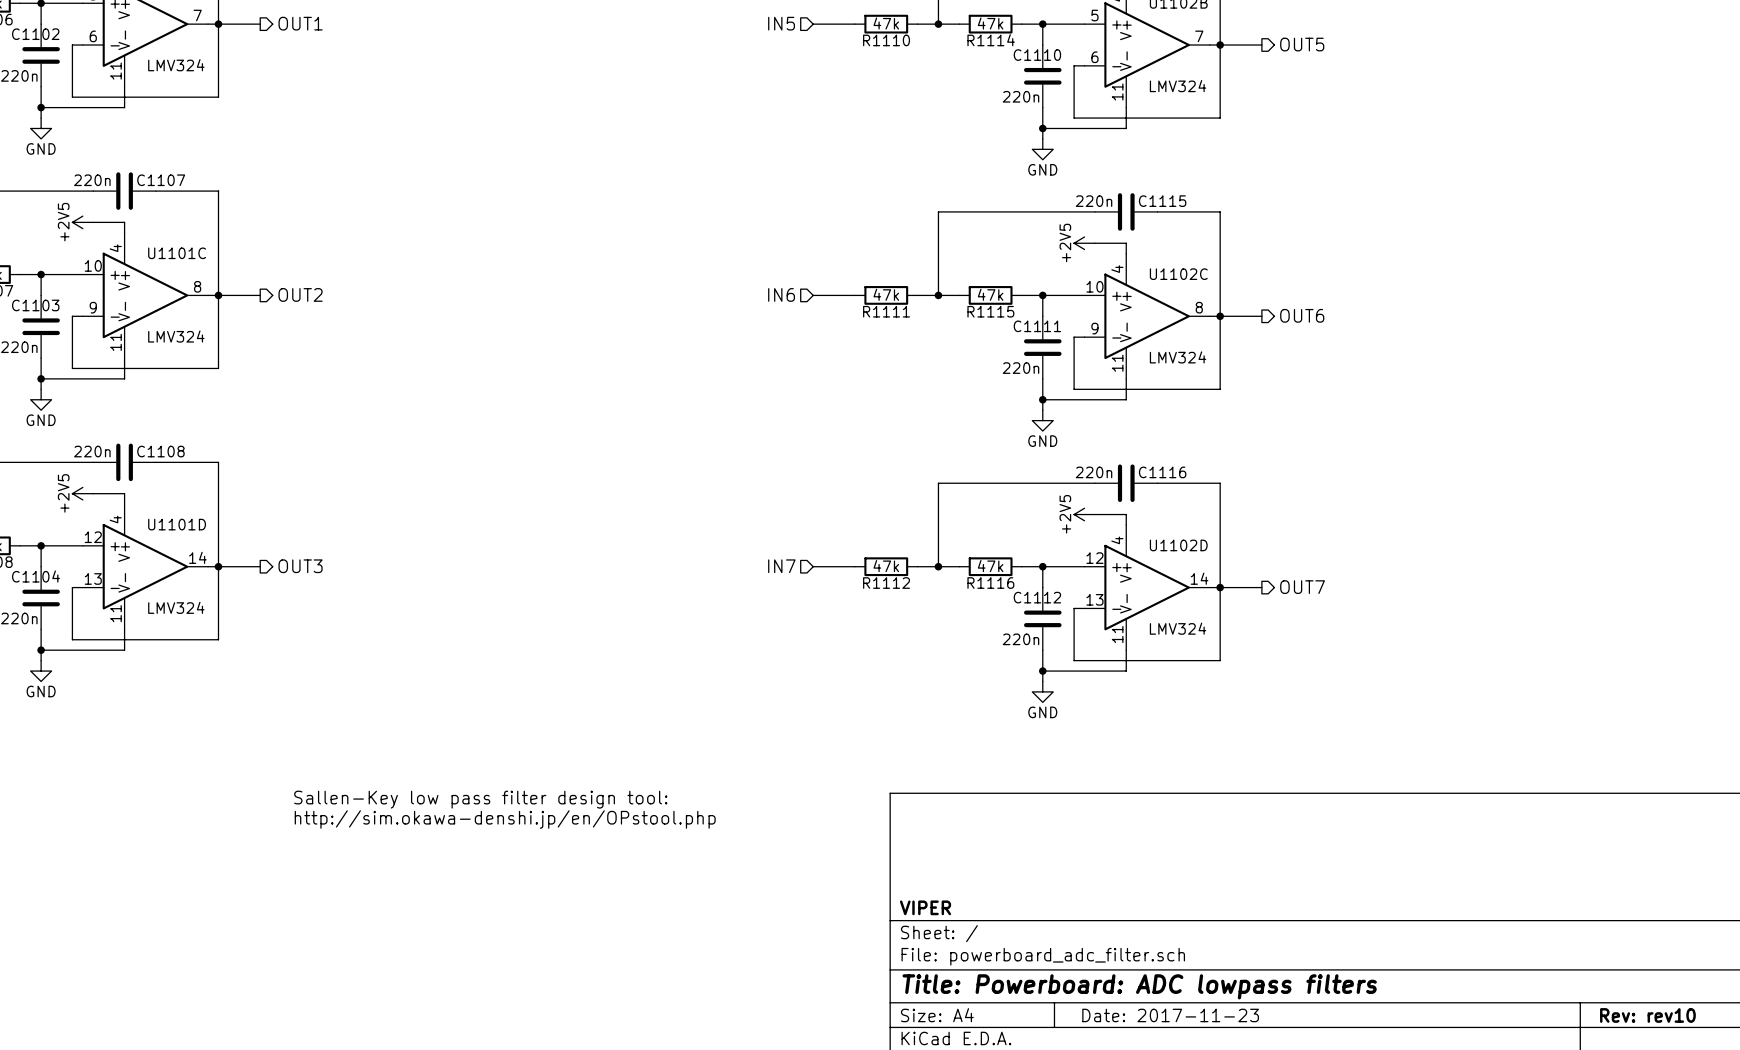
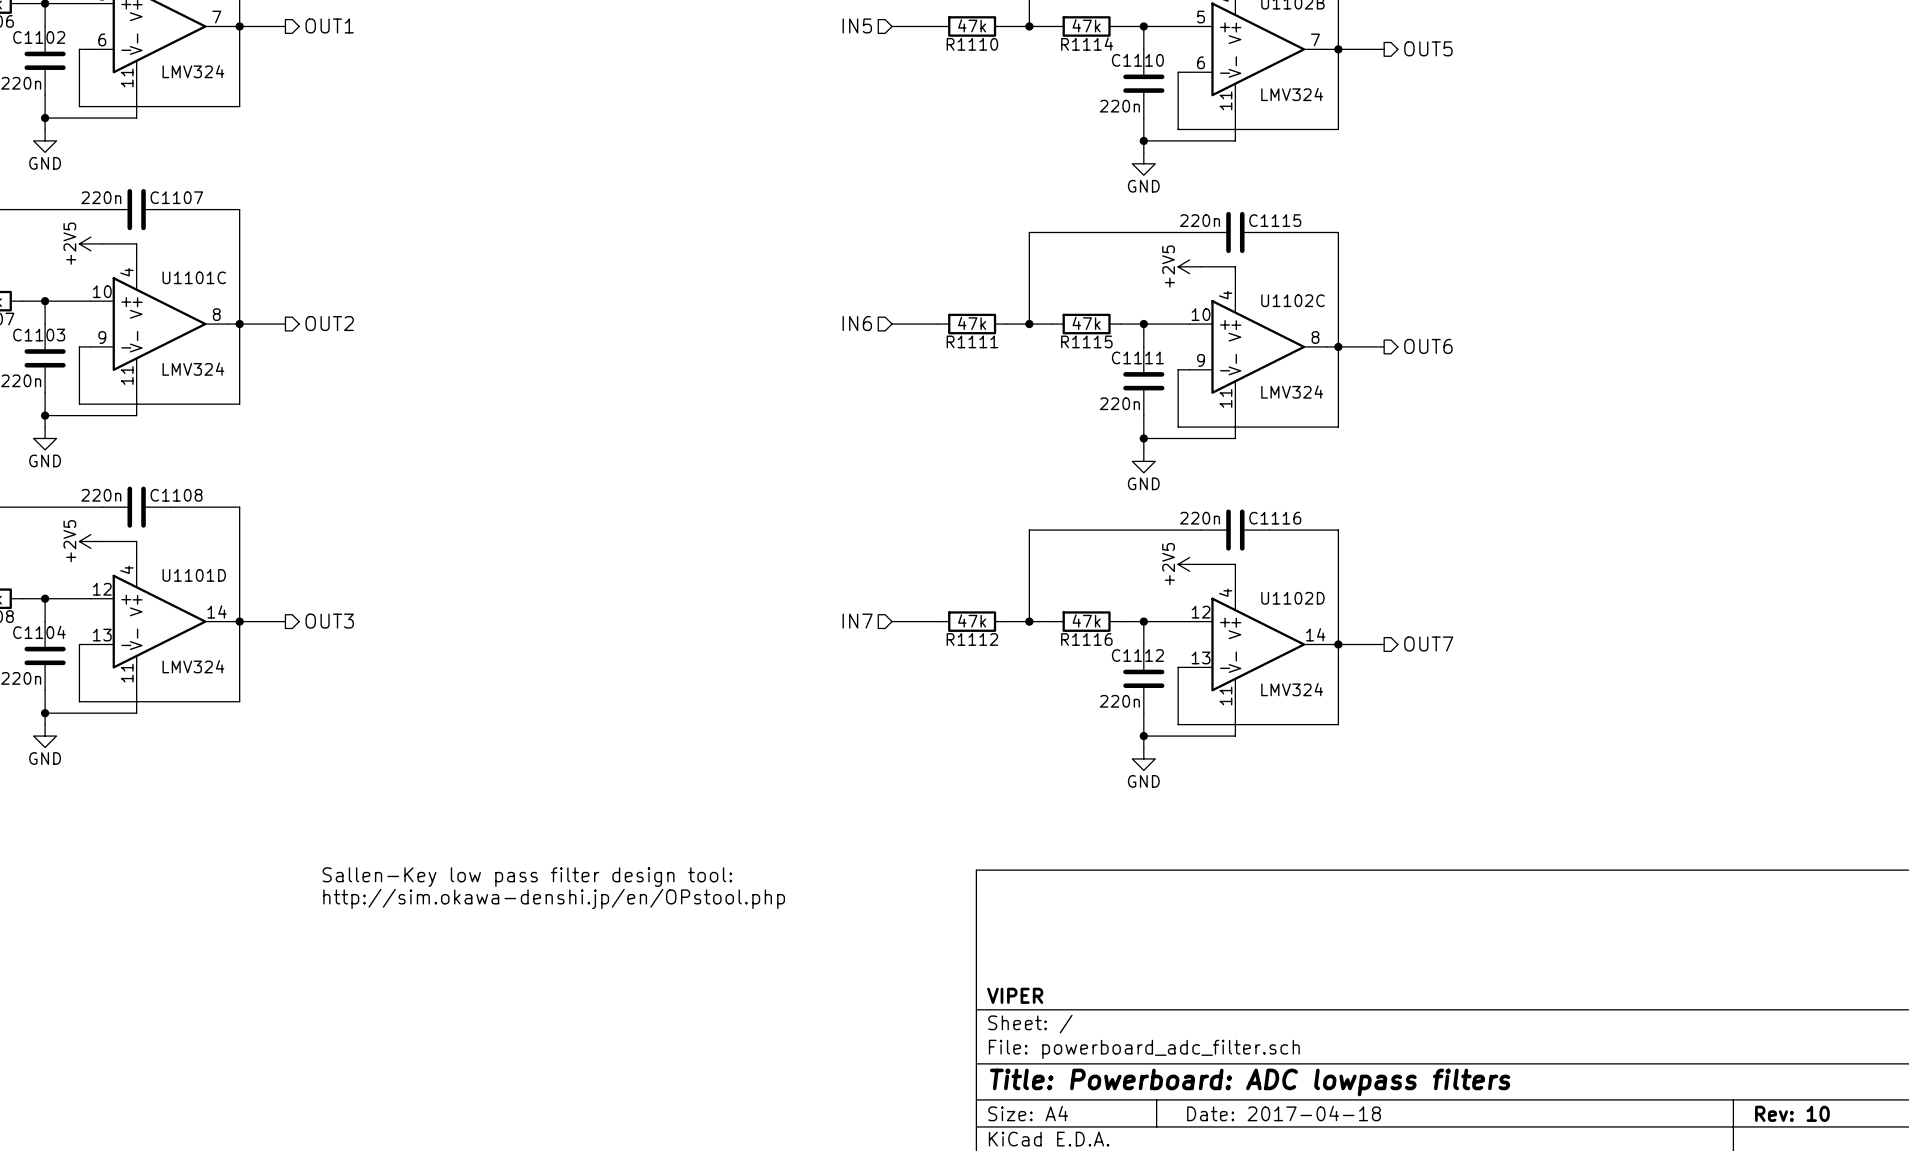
title block: Date: 2017-11-23 (1170, 1015) -> Date: 2017-04-18 (1284, 1113)
title block: Rev: rev10 (1647, 1015) -> Rev: 10 (1792, 1113)

